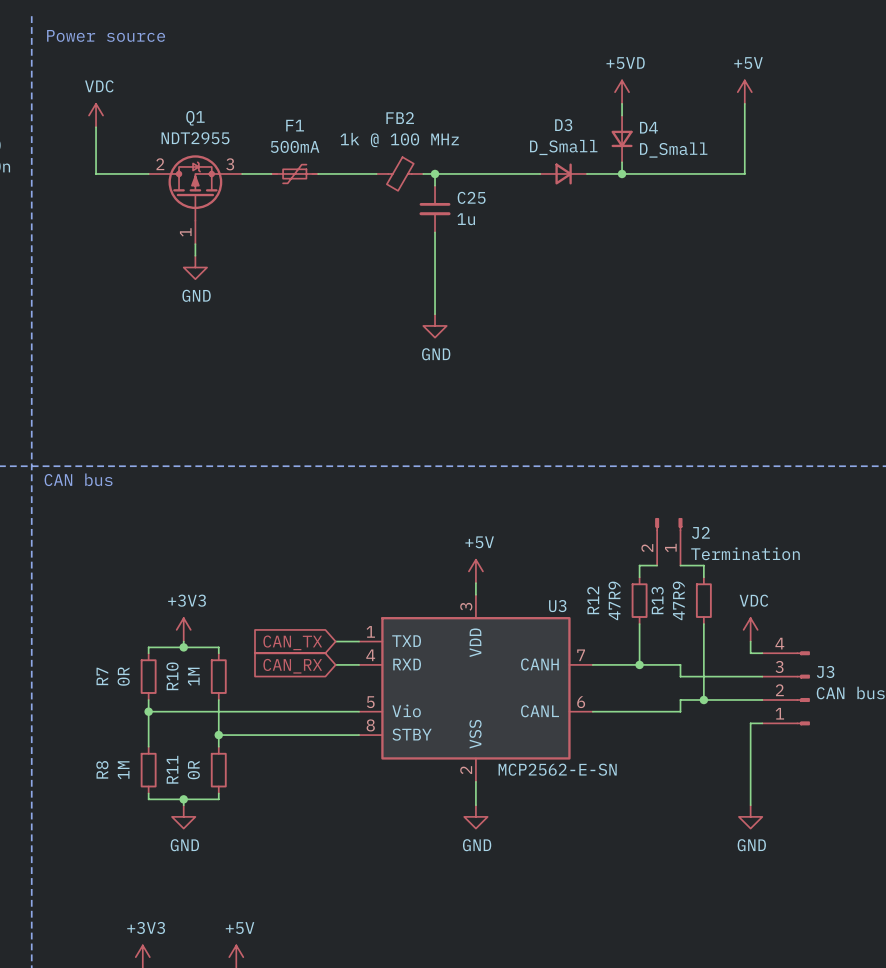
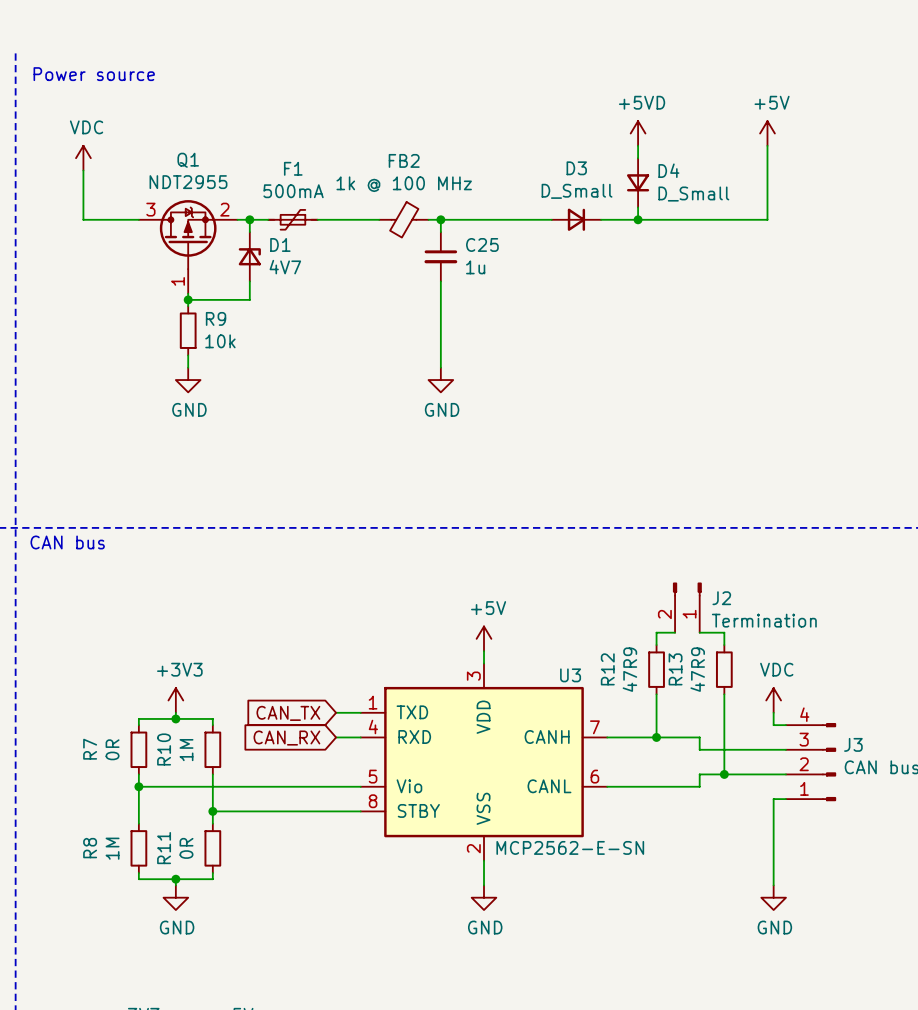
Q1 pin number: 2 (160, 164) -> 3 (150, 209)
Q1 pin number: 3 (230, 164) -> 2 (224, 209)
wire: none -> (249, 219) (249, 232)
junction: none -> (249, 219)
D1: none -> 4V7 (249, 256)
wire: none -> (249, 281) (249, 299) (188, 299)
junction: none -> (188, 299)
power symbol position: GND (195, 267) -> GND (188, 380)
R9: none -> 10k (188, 330)
wire: none -> (188, 355) (188, 367)

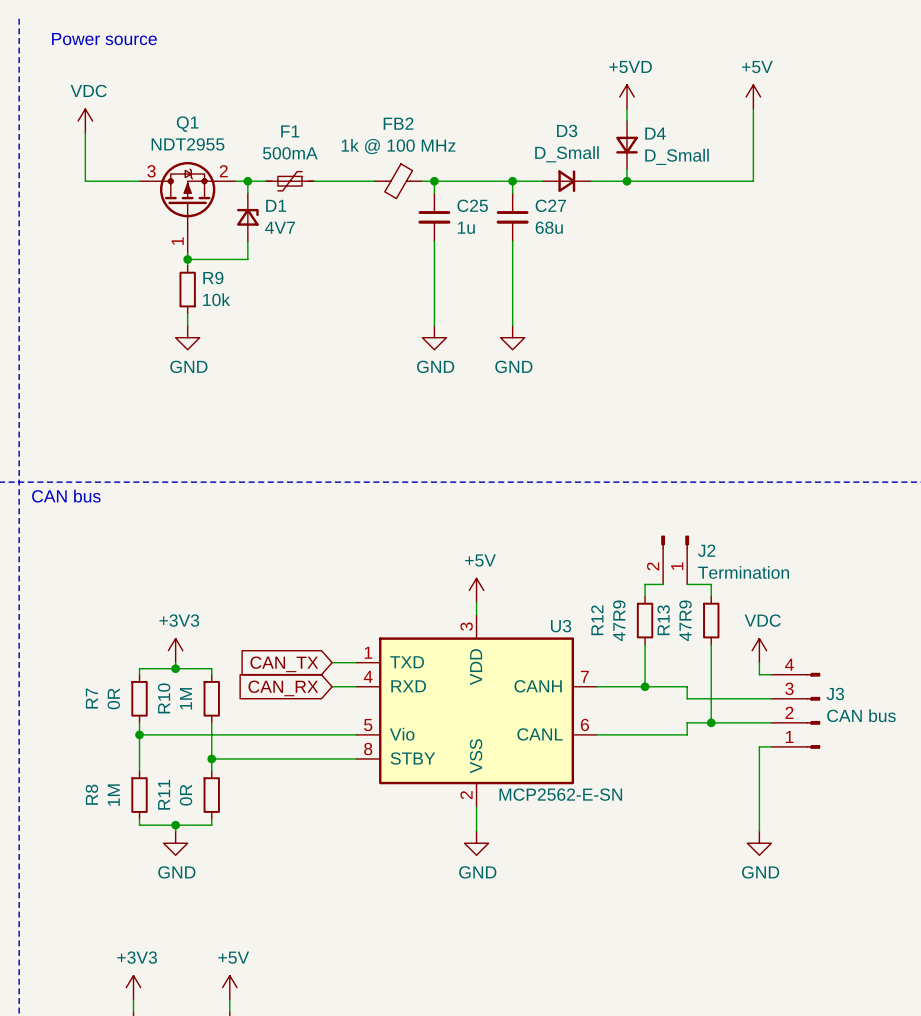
wire: none -> (512, 181) (512, 193)
junction: none -> (512, 181)
C27: none -> 68u (512, 217)
wire: none -> (512, 241) (512, 325)
power symbol: none -> GND (512, 337)

